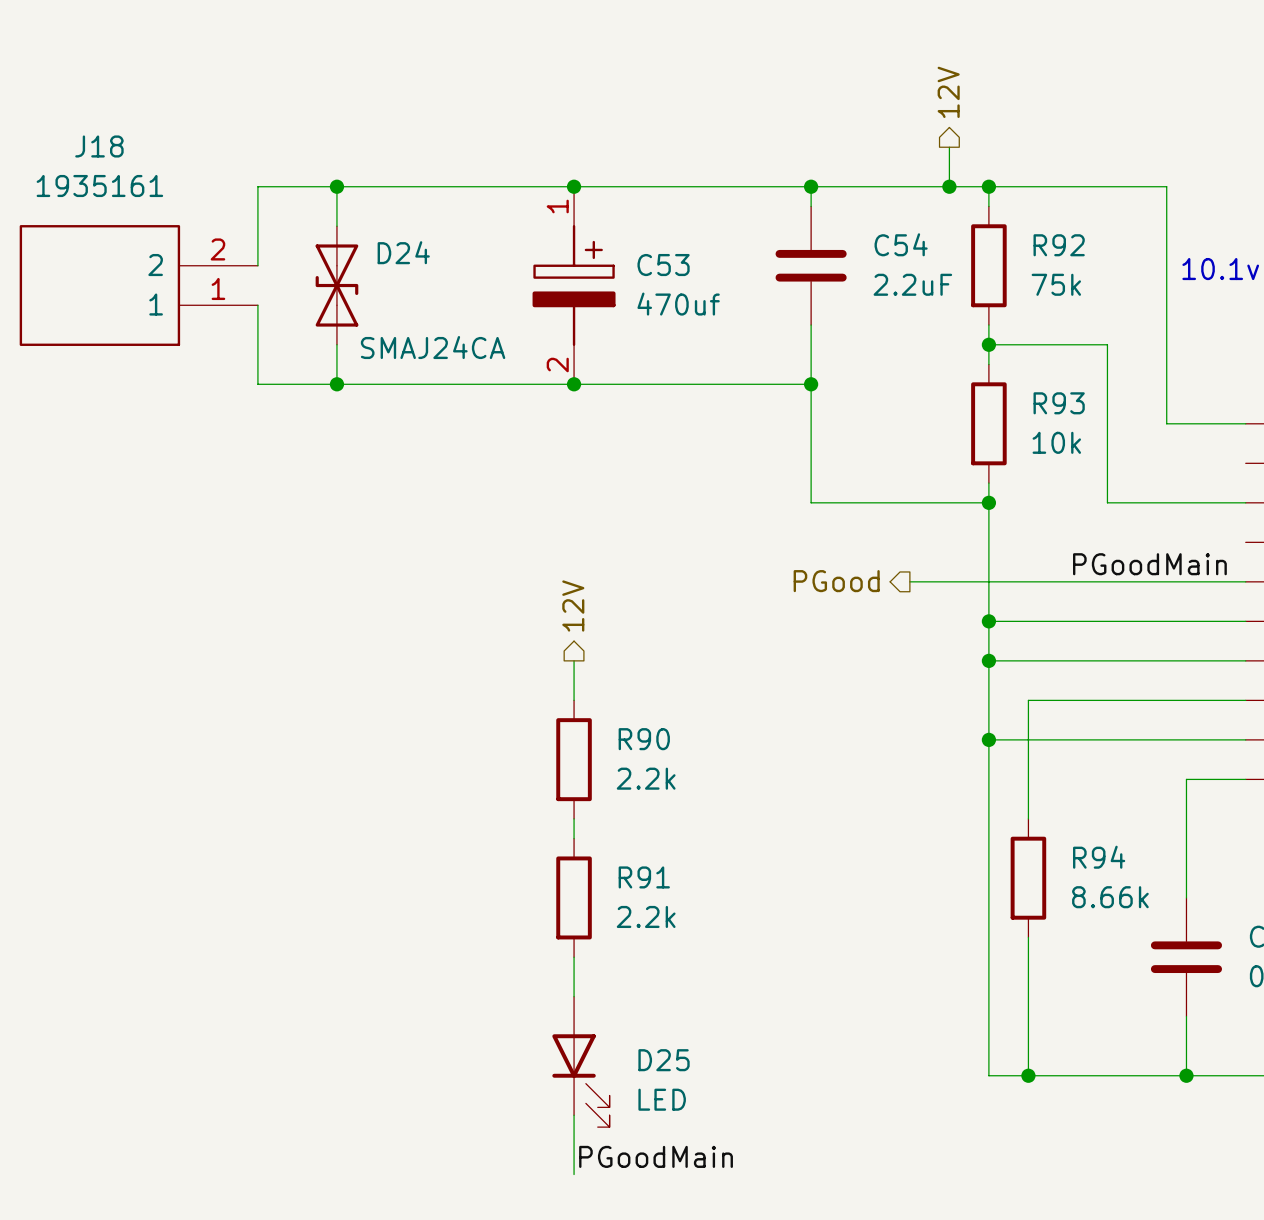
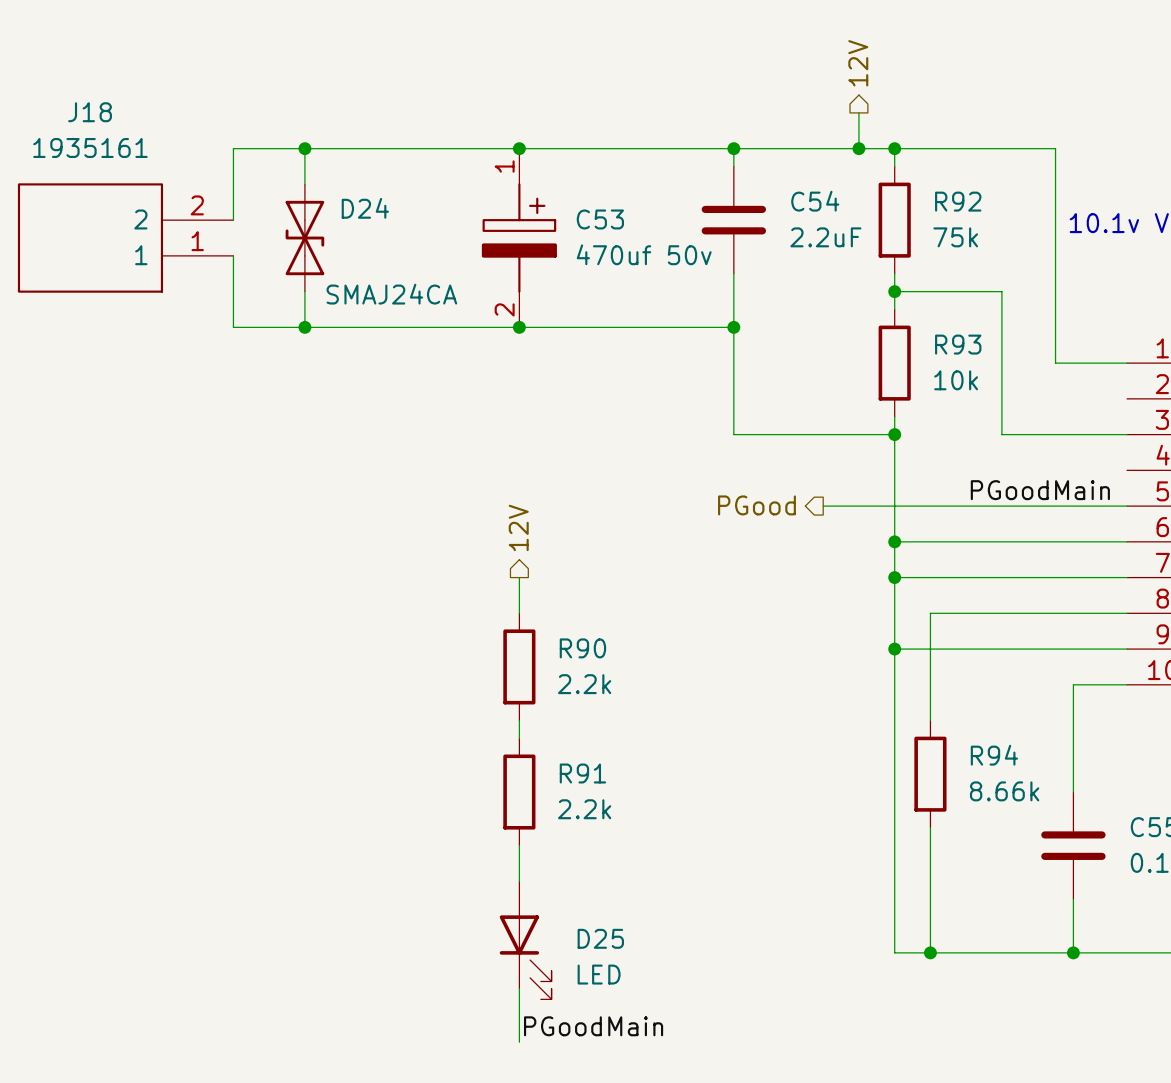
C53 value: 470uf (678, 304) -> 470uf 50v (644, 254)

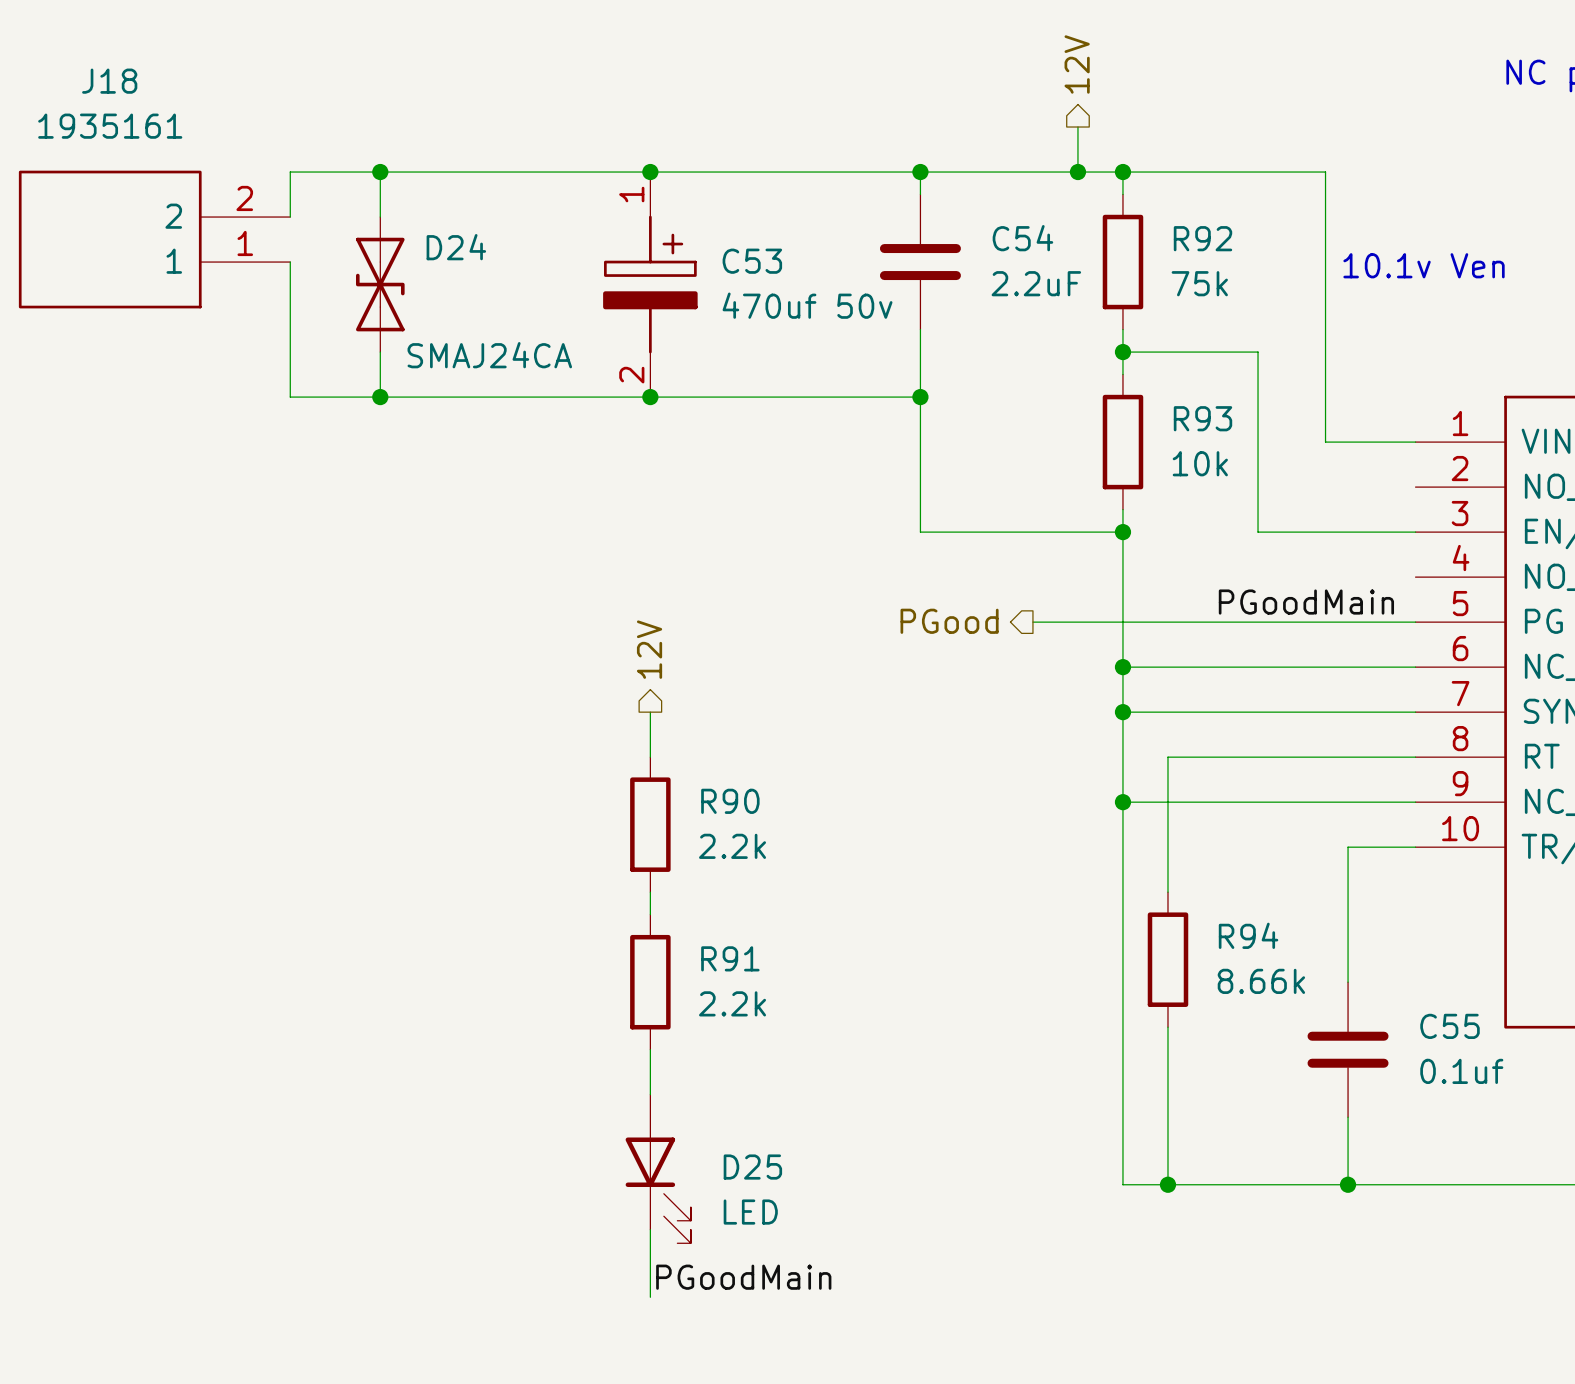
wire: (233, 184) (233, 220) -> (290, 307) (290, 262)
J18 position: (125, 238) -> (154, 239)

